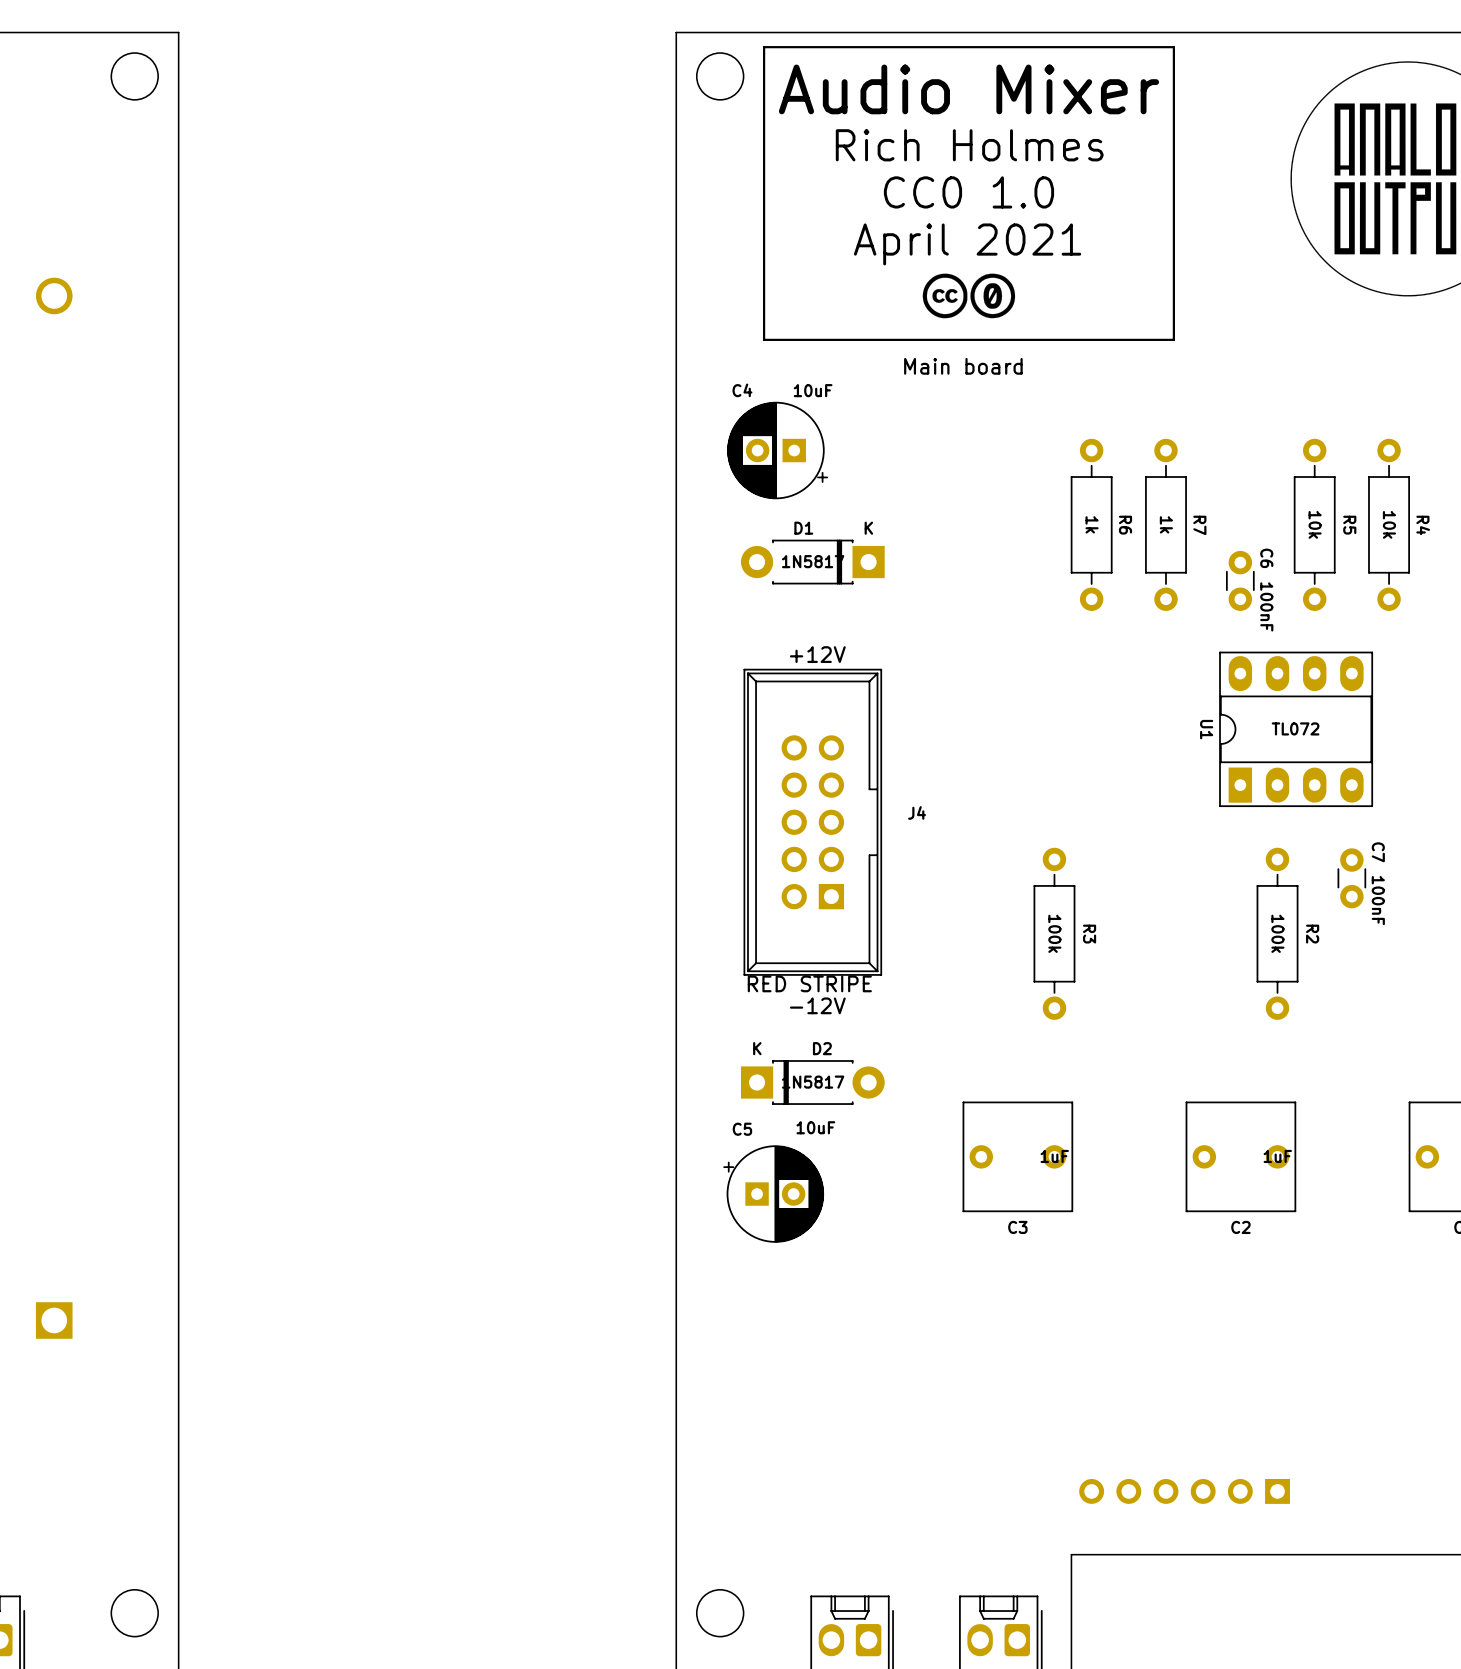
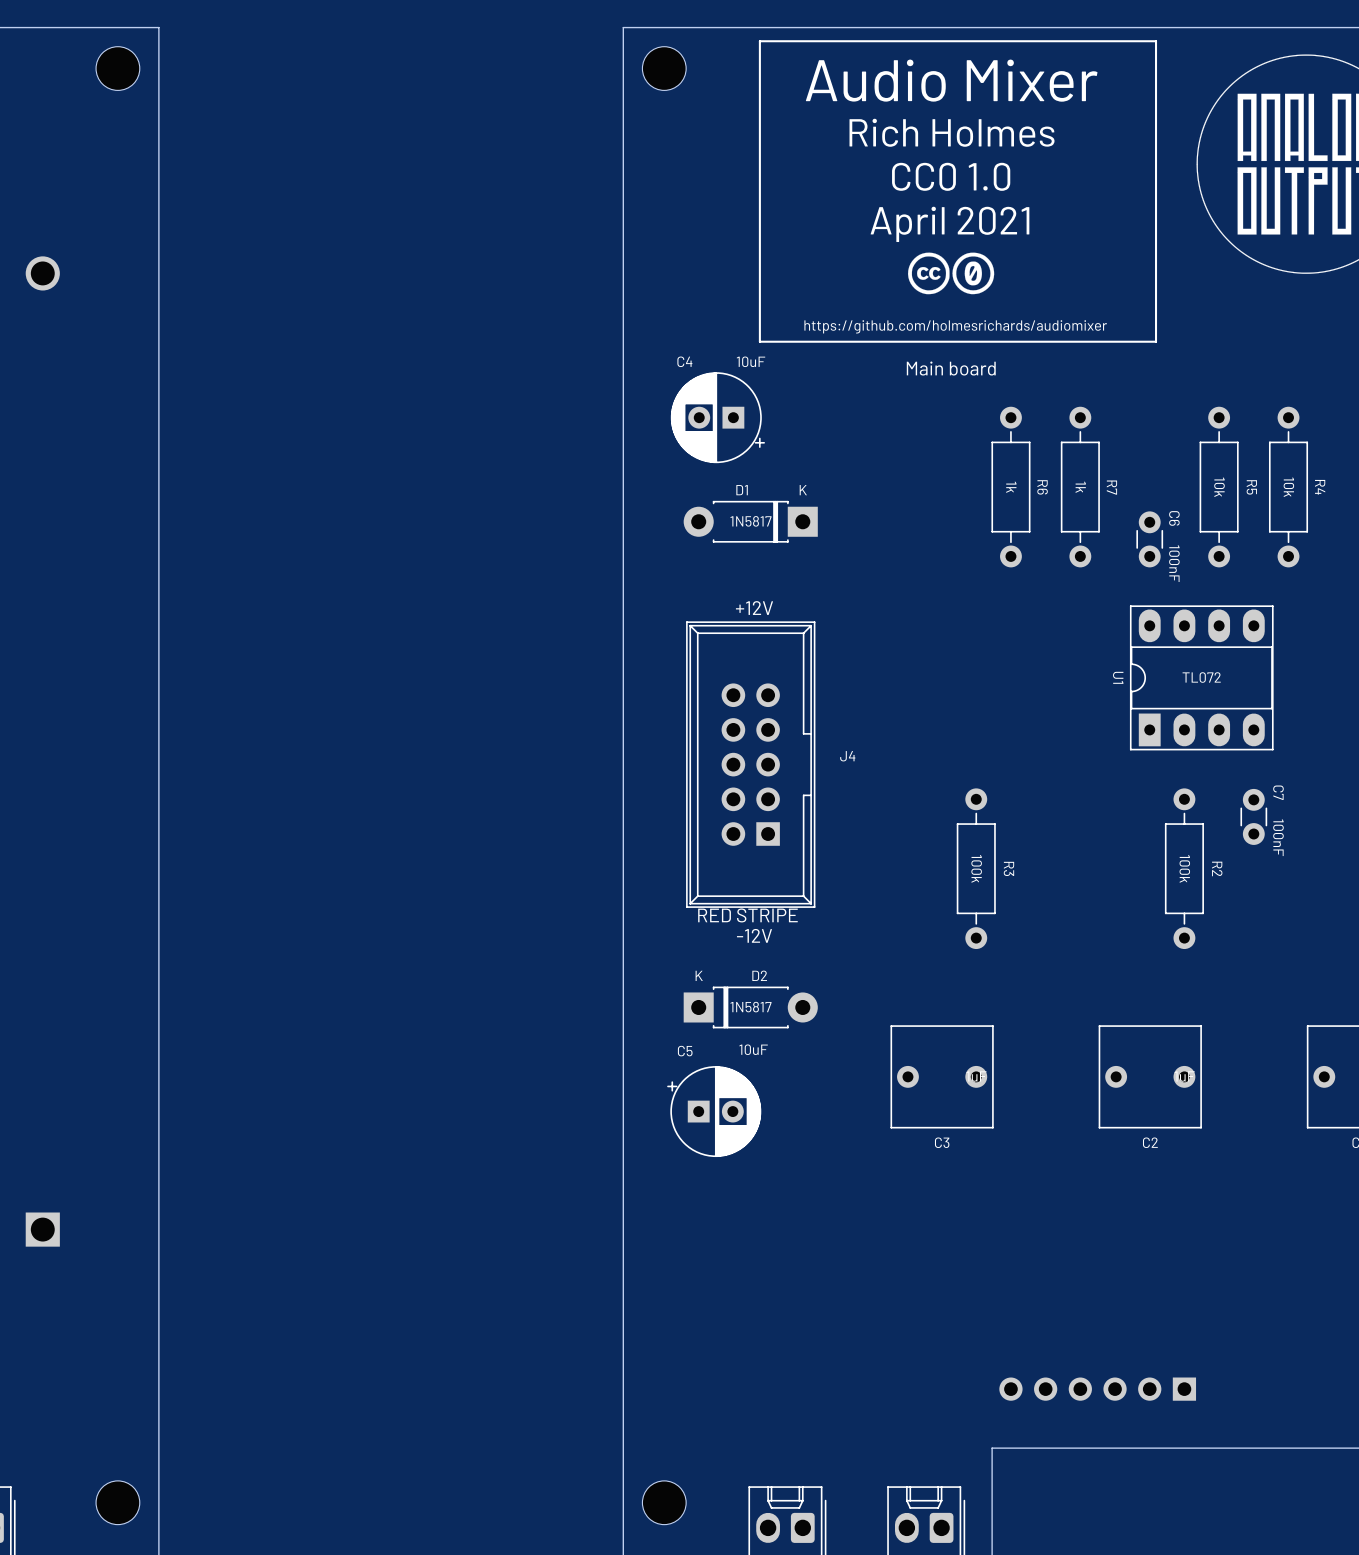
line: (1173, 47) (1173, 339) (764, 339) (764, 47) (822, 47) -> (1087, 41) (1156, 41) (1156, 341) (759, 341) (759, 41)
text position: Audio Mixer (968, 89) -> Audio Mixer (951, 80)
text position: Rich Holmes (969, 145) -> Rich Holmes (952, 132)
text position: CC0 1.0 (968, 192) -> CC0 1.0 (951, 176)
text position: April 2021 (967, 244) -> April 2021 (949, 224)
drawing position: (968, 295) -> (951, 273)
text: none -> https://github.com/holmesrichards/audiomixer (955, 326)
text position: Main board (963, 366) -> Main board (951, 368)

